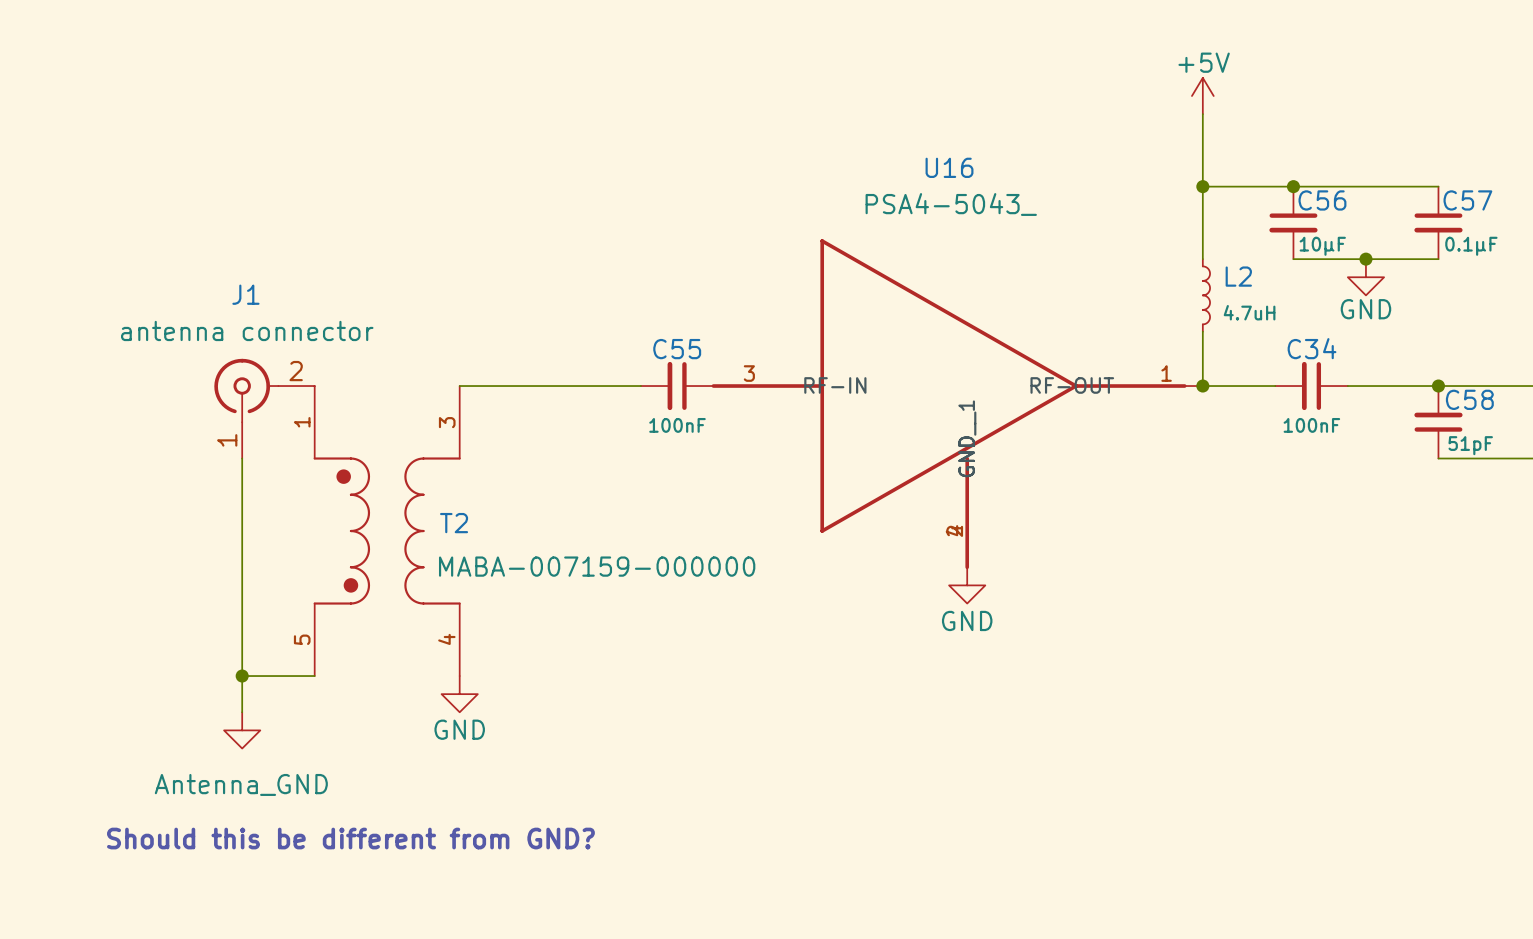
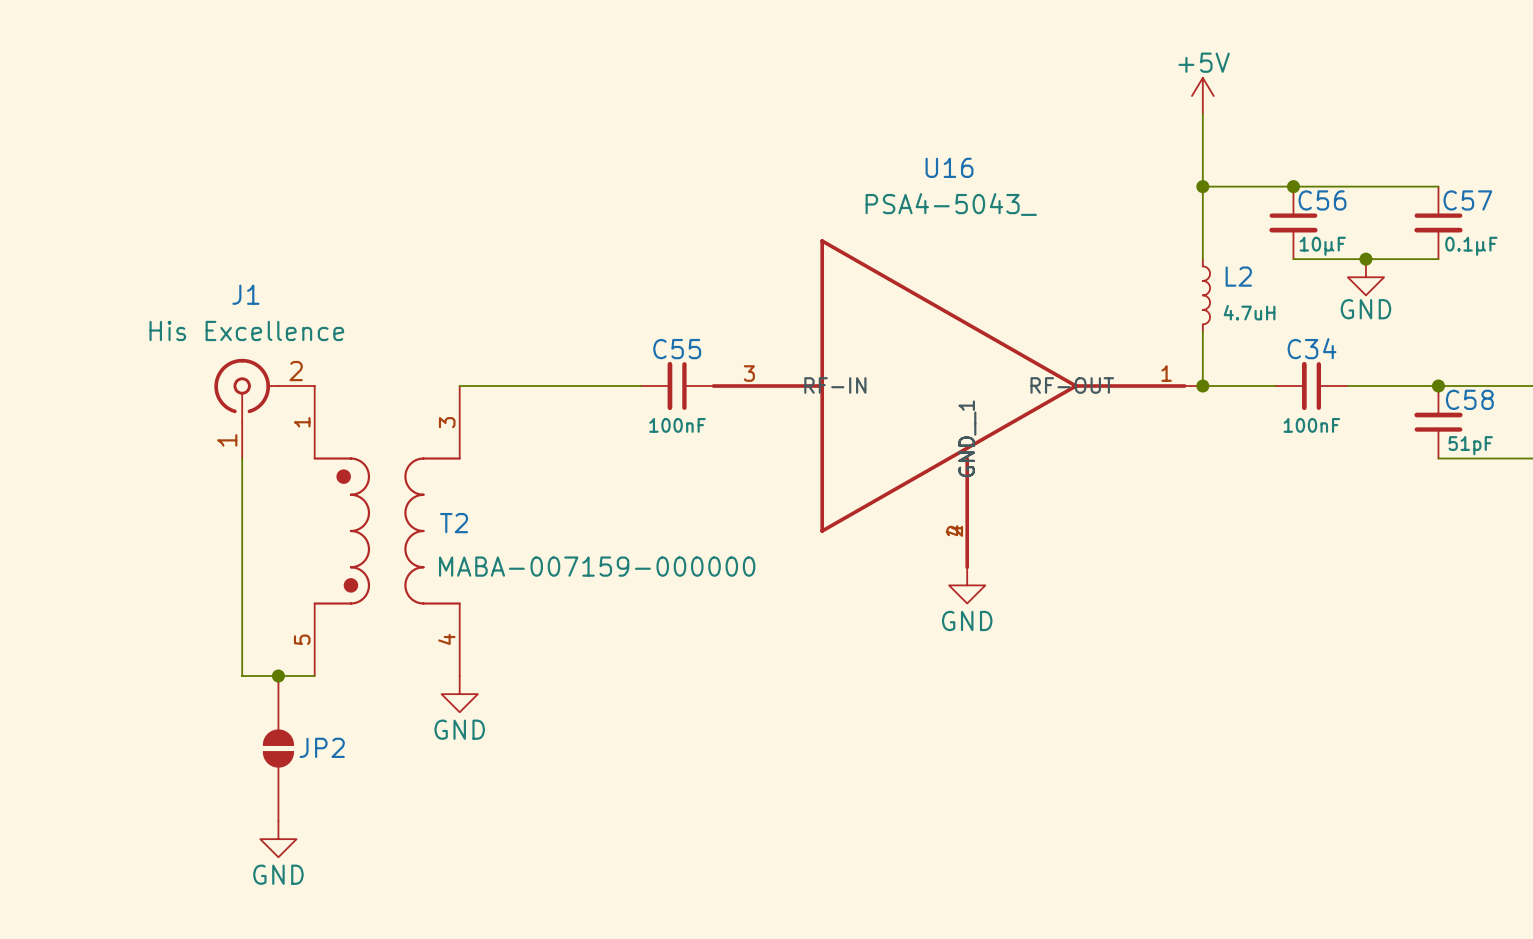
J1 value: antenna connector (247, 330) -> His Excellence (246, 330)
wire: (242, 676) (242, 712) -> none
junction position: (242, 676) -> (278, 676)
power symbol: Antenna_GND (242, 730) -> none
JP2: none -> (278, 748)
text: Should this be different from GND? (350, 838) -> none
power symbol: none -> GND (278, 839)

